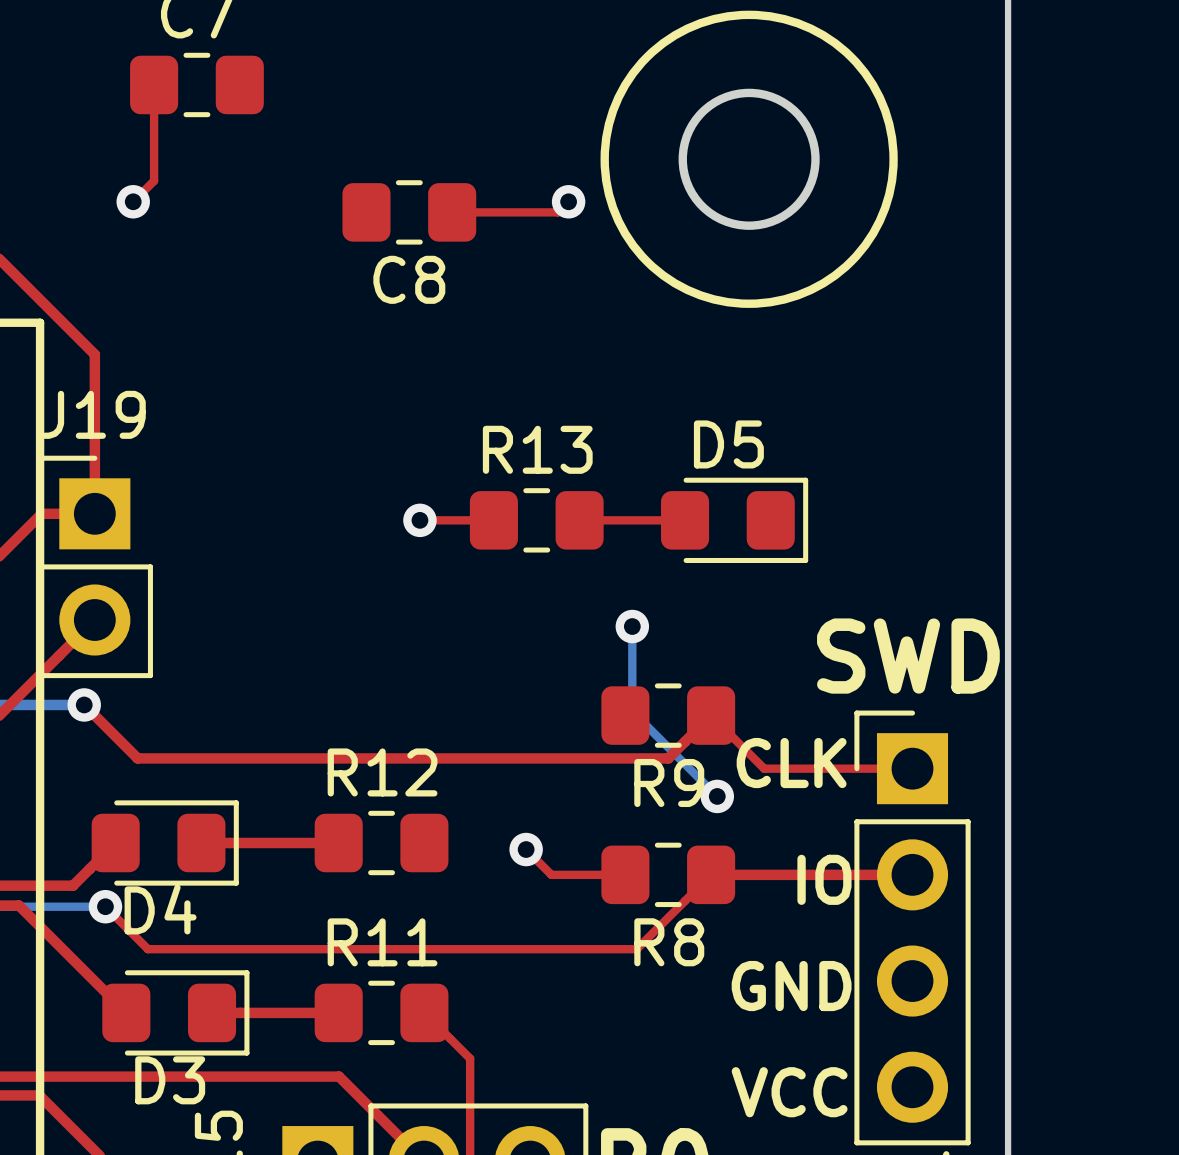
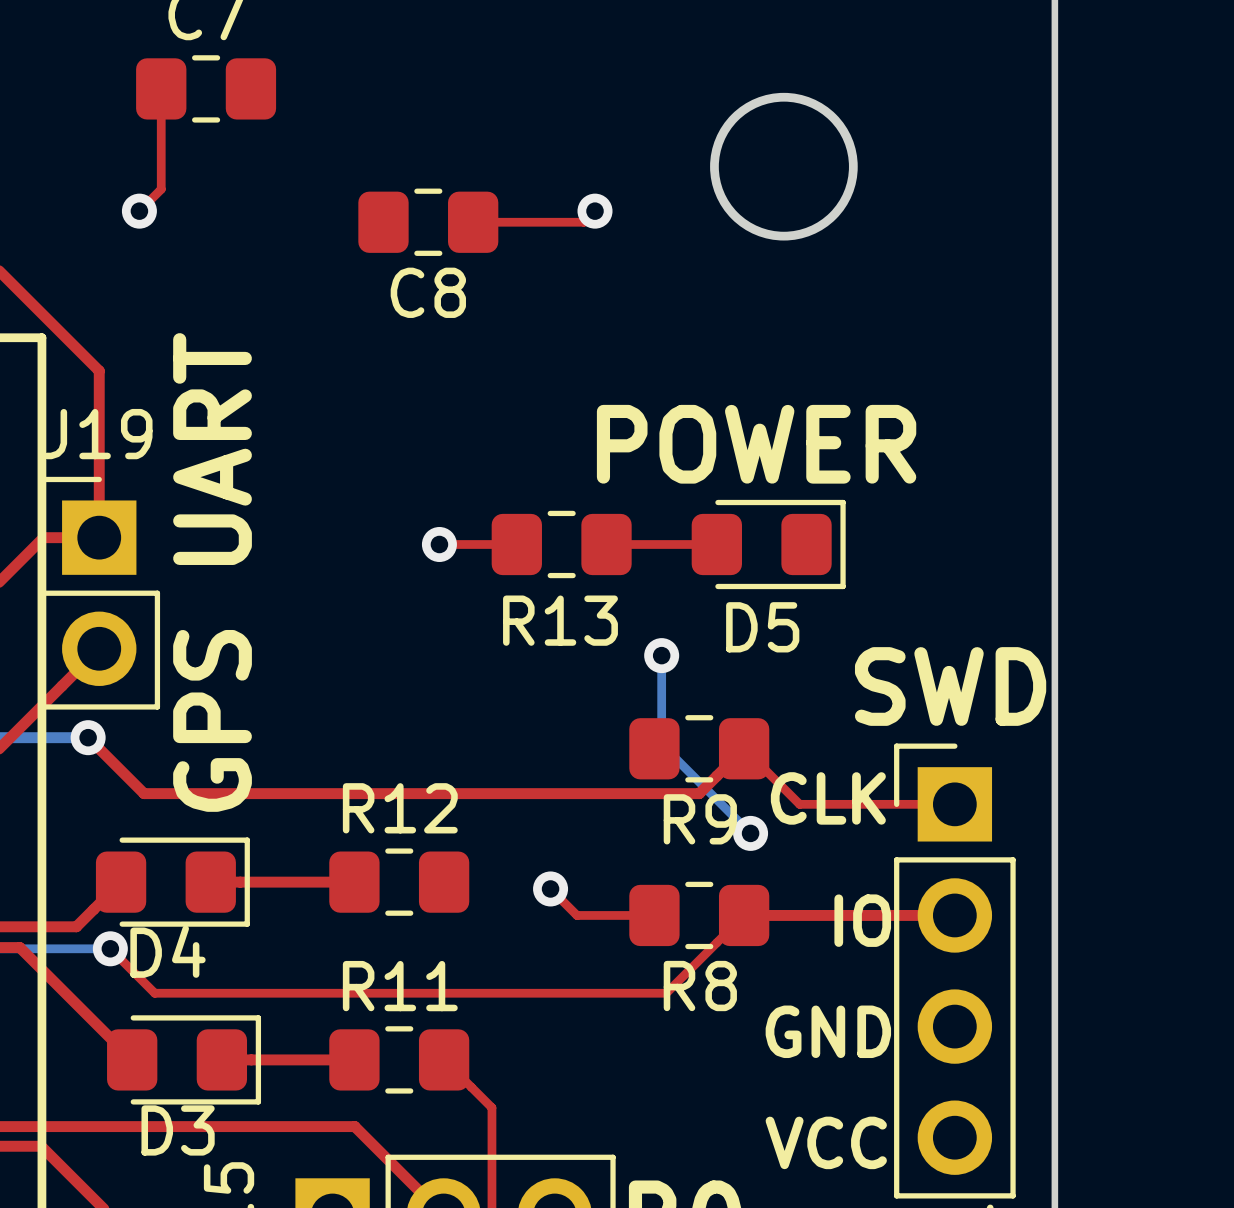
drawing: [600, 10, 898, 308] -> none
text: none -> POWER (756, 444)
D5 name position: D5 (728, 444) -> D5 (762, 627)
R13 name position: R13 (537, 449) -> R13 (560, 620)
text: none -> GPS UART (212, 572)

